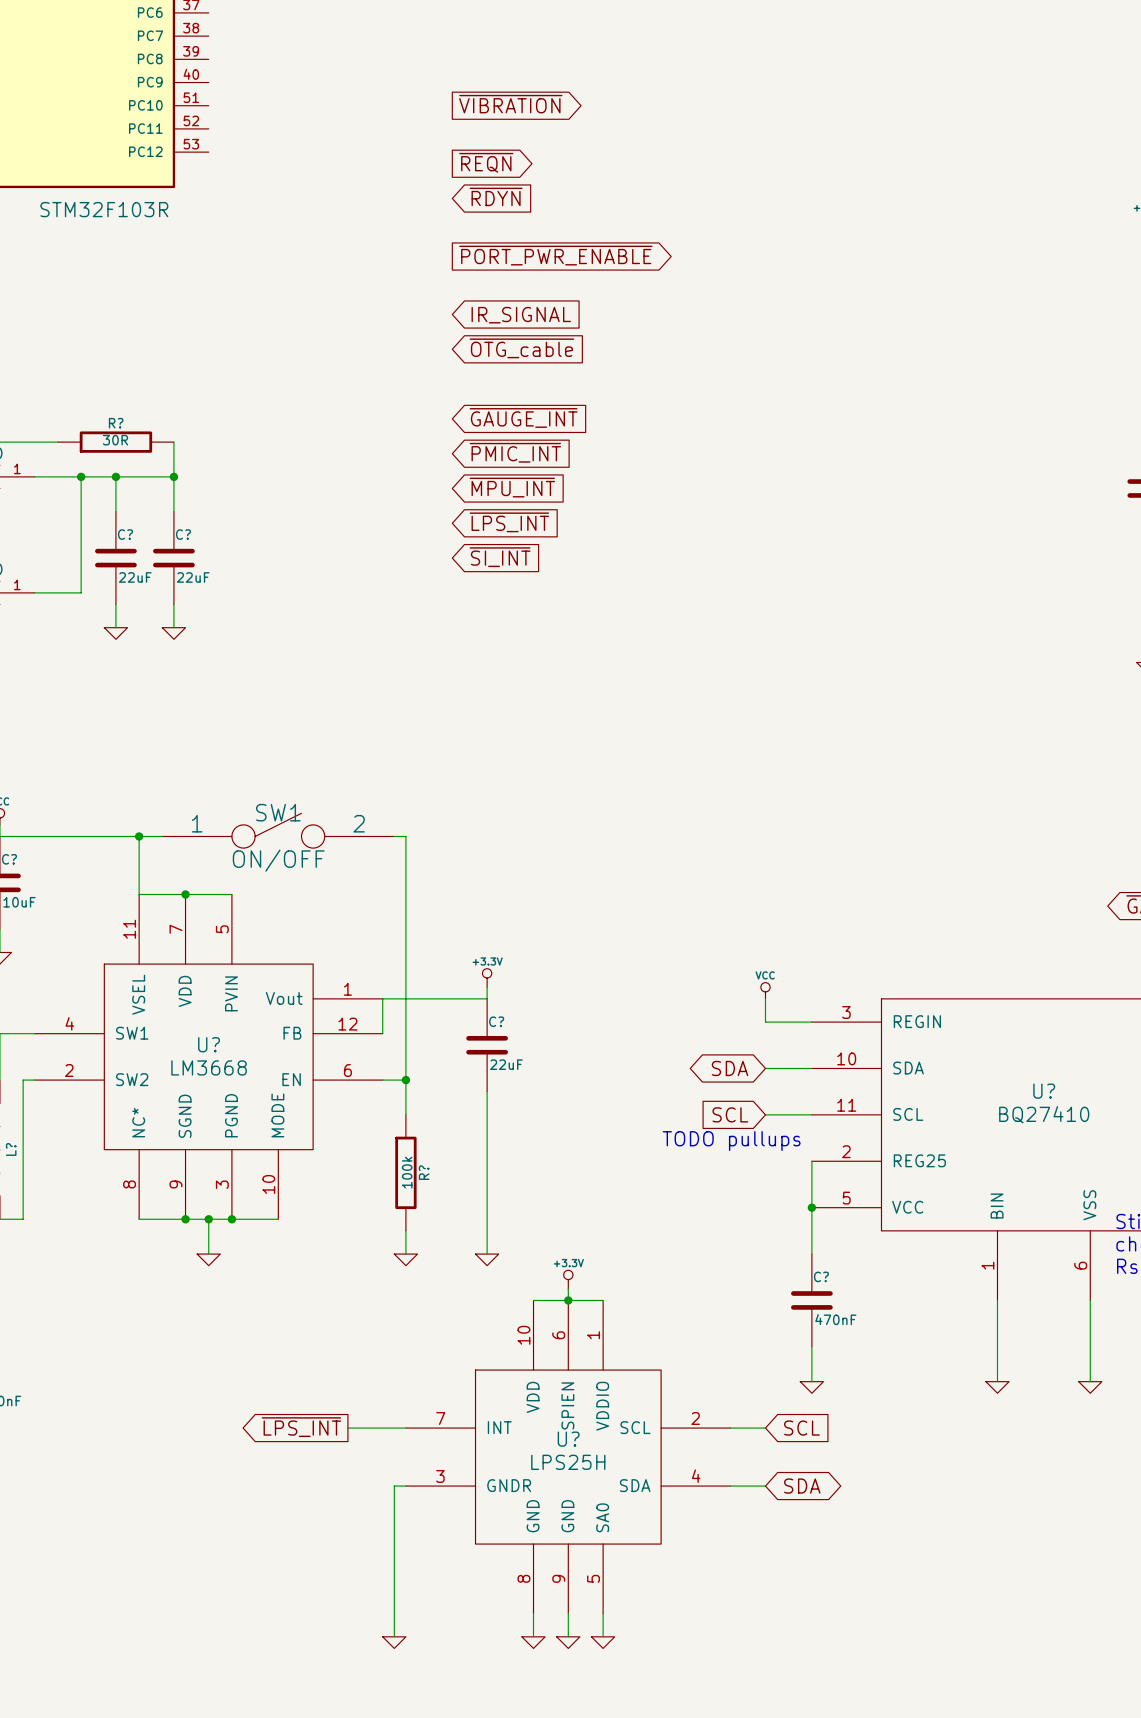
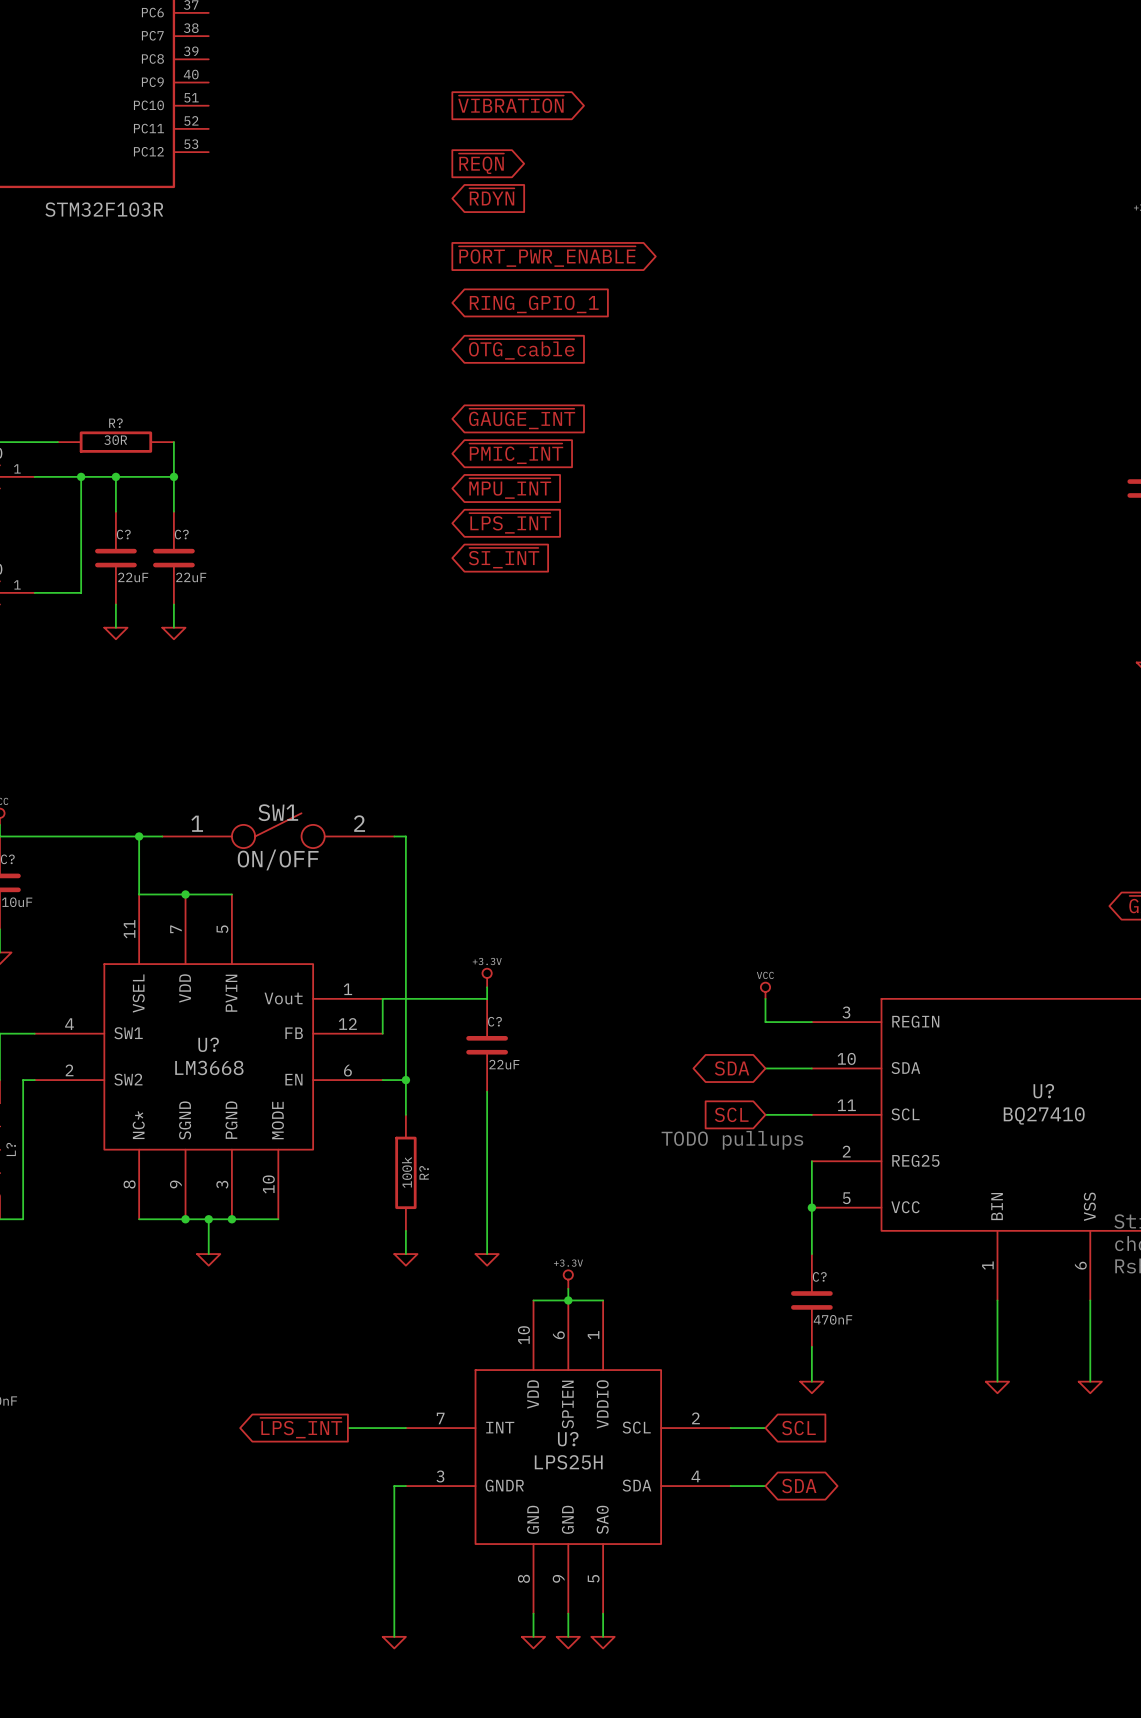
global label: none -> RING_GPIO_1 (534, 304)
global label: IR_SIGNAL (521, 315) -> none

